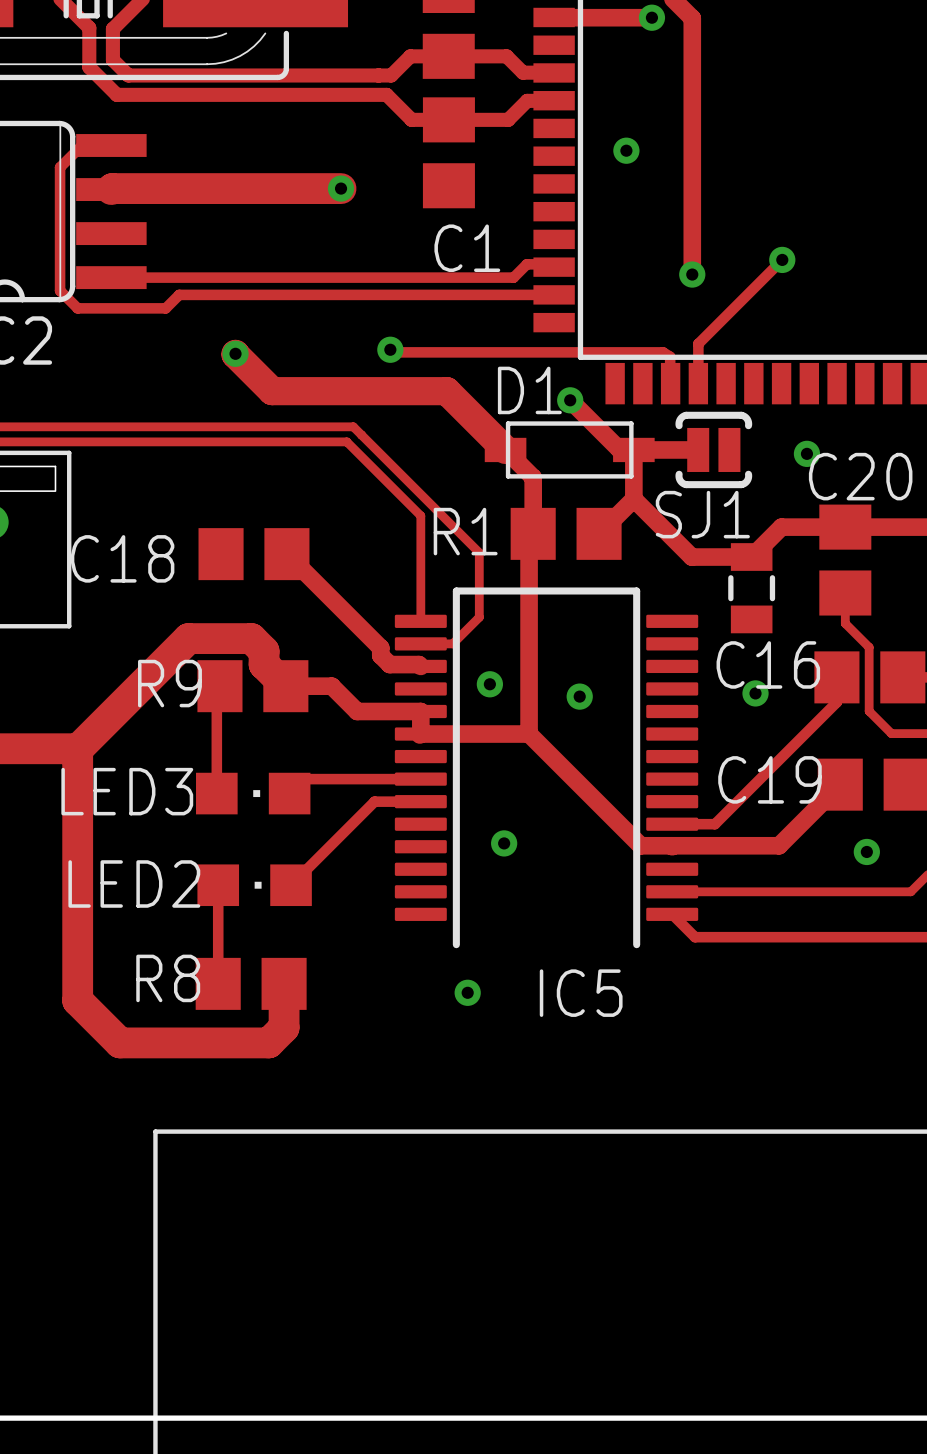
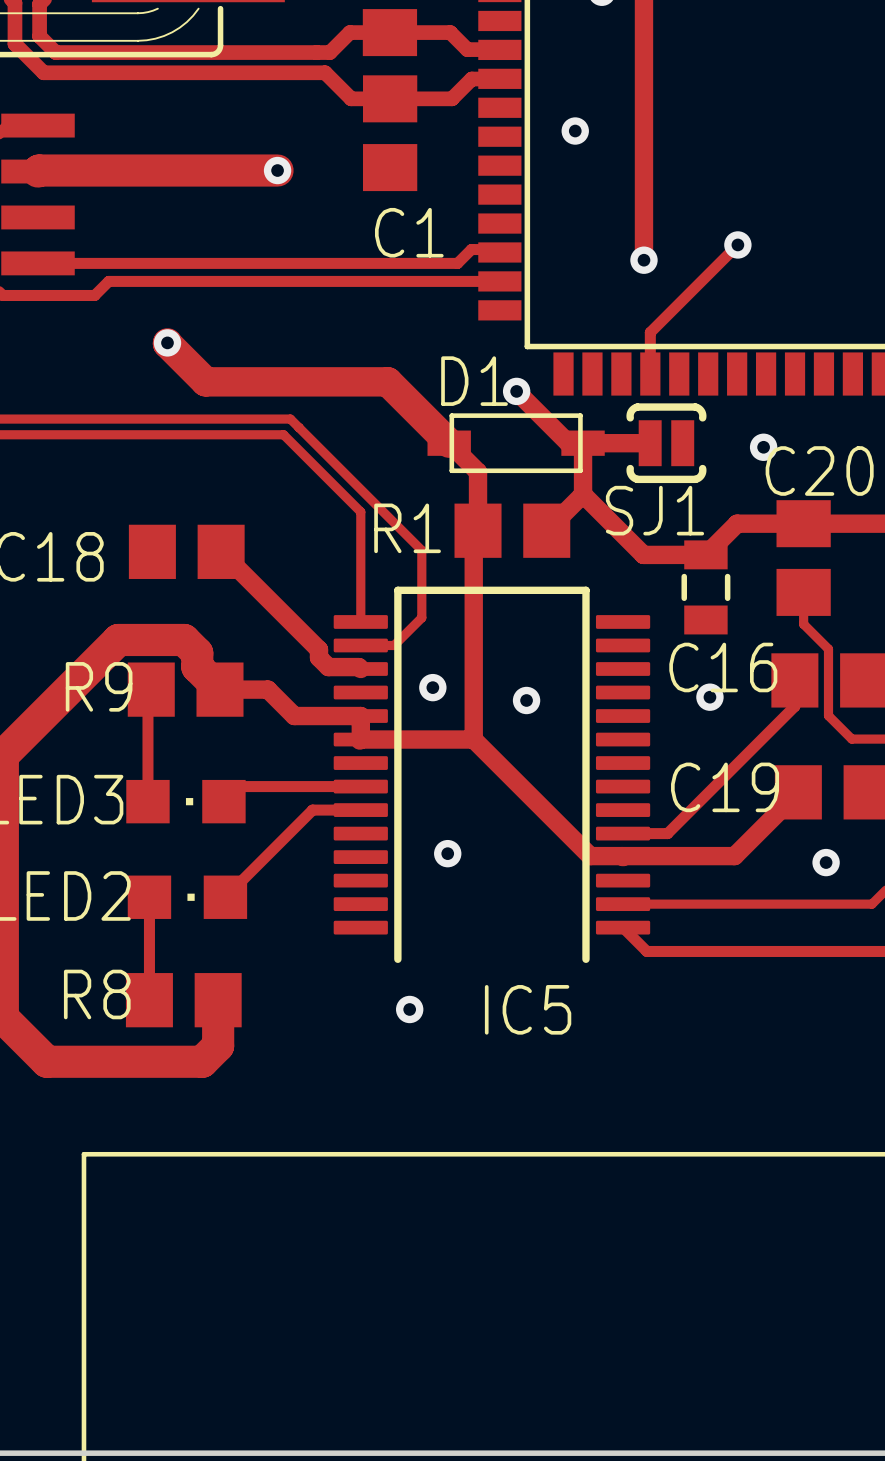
track: (390, 349) (392, 352) (663, 352) (670, 356) (670, 383) -> none
via: (390, 349) -> none

